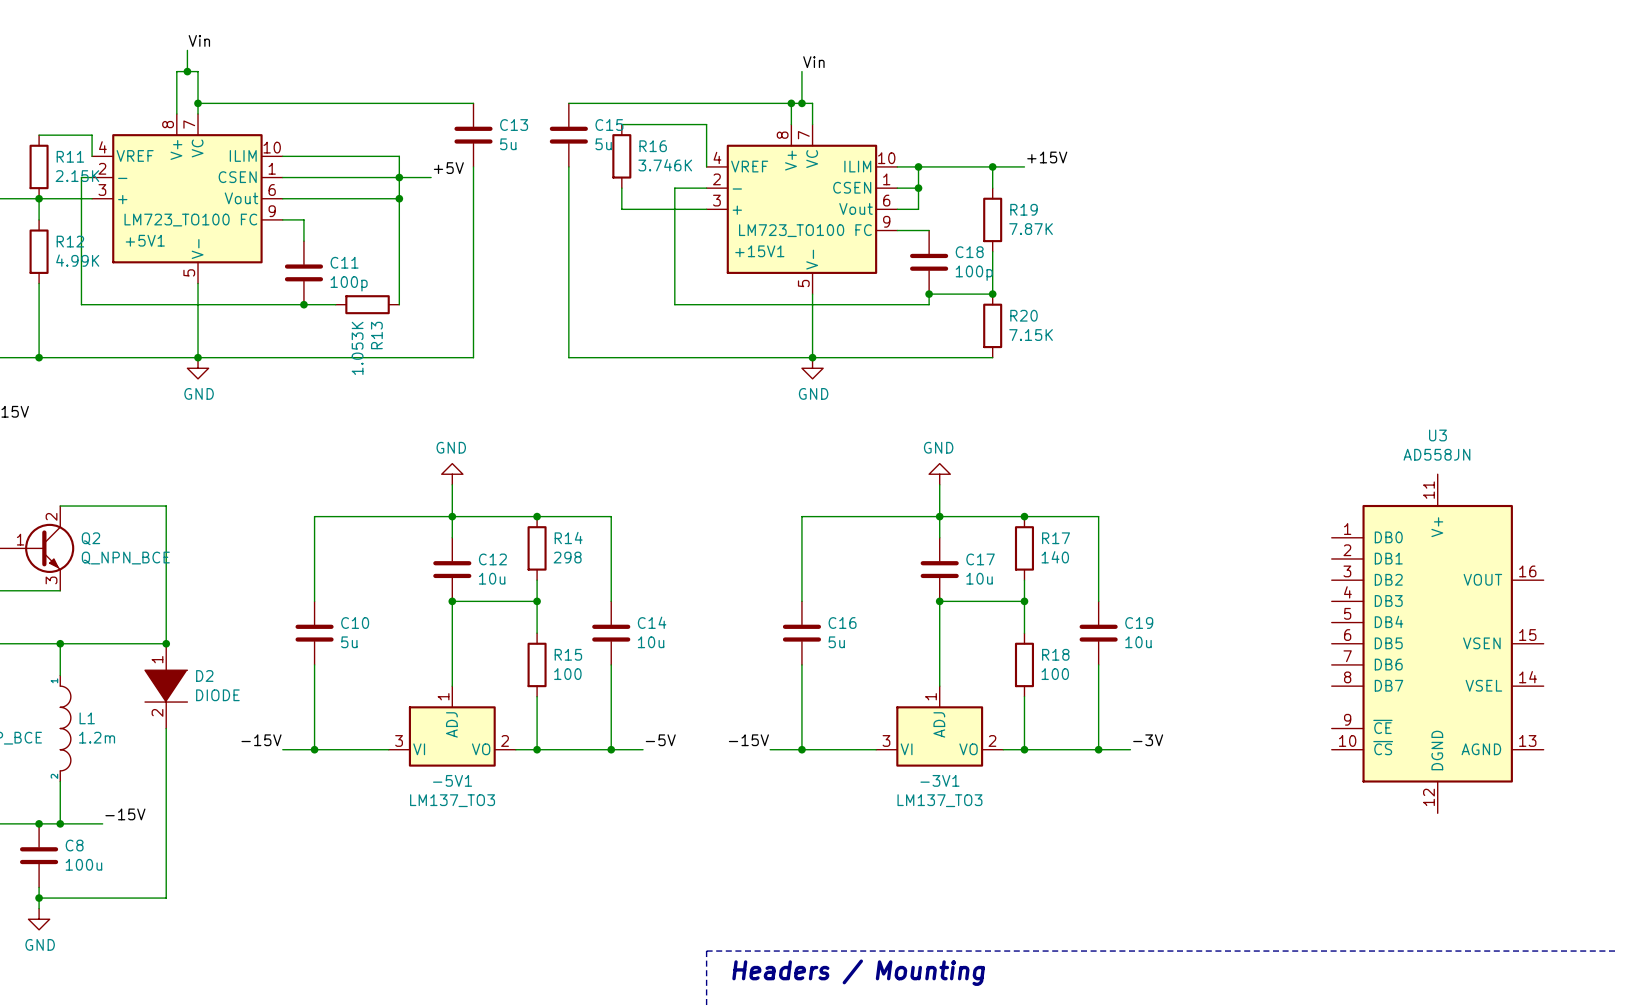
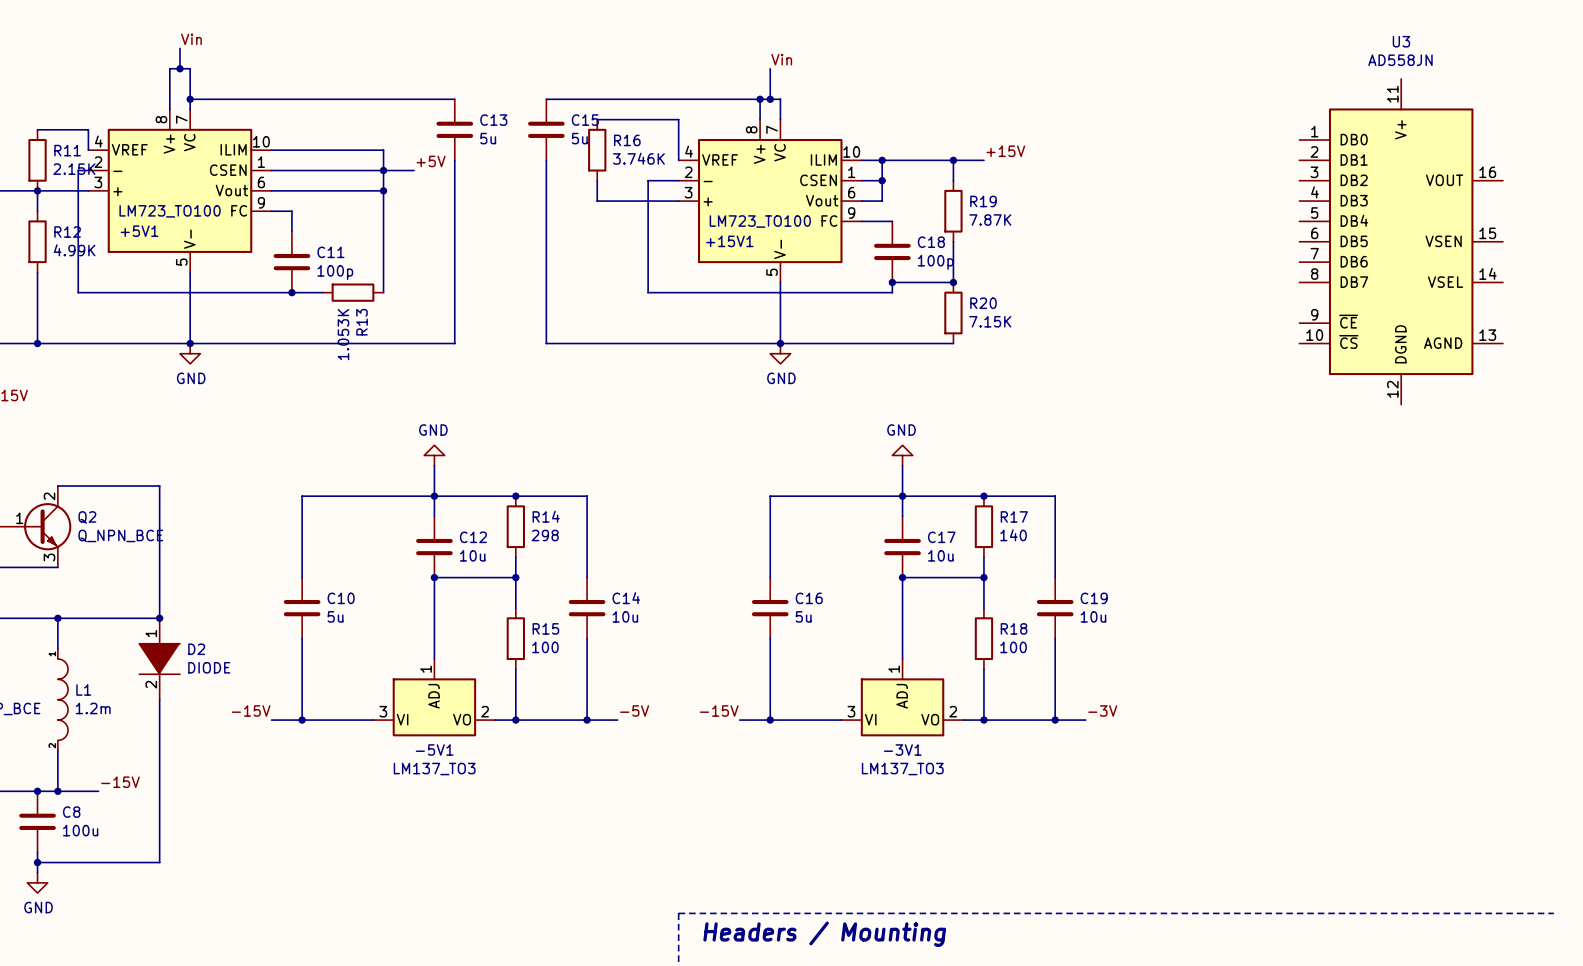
U3 position: (1437, 643) -> (1401, 241)

